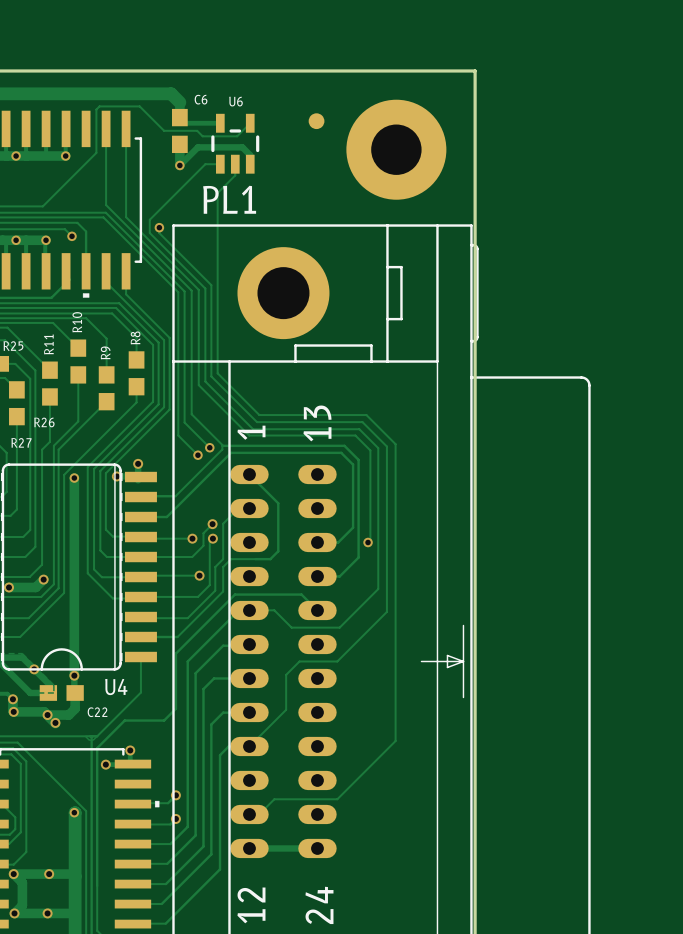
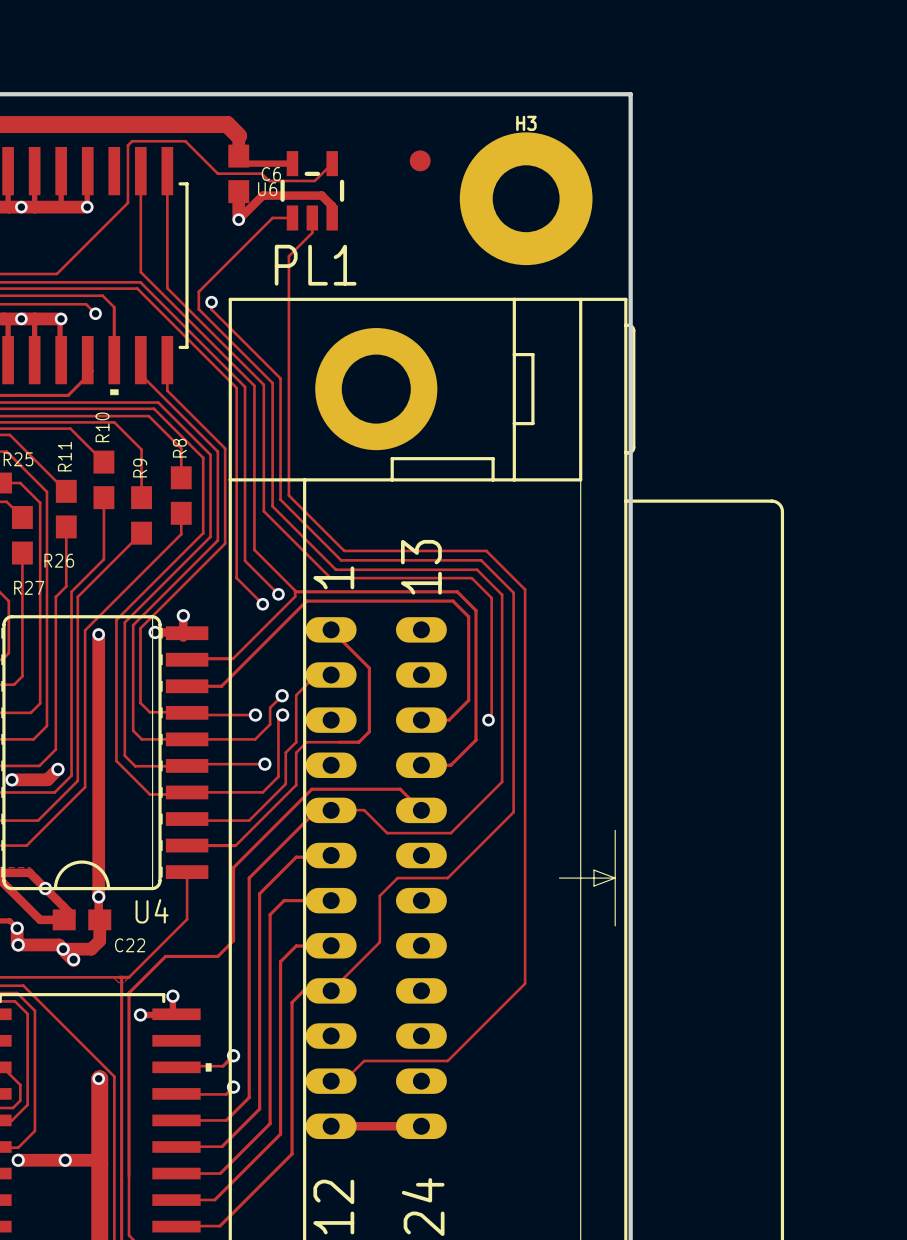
H3 name: none -> H3 (526, 123)
C6 name position: C6 (201, 99) -> C6 (271, 174)
U6 name position: U6 (236, 101) -> U6 (267, 189)
track: (13, 874) (22, 882) (22, 905) (14, 913) (71, 913) -> none
via: (14, 913) -> none
via: (47, 913) -> none

